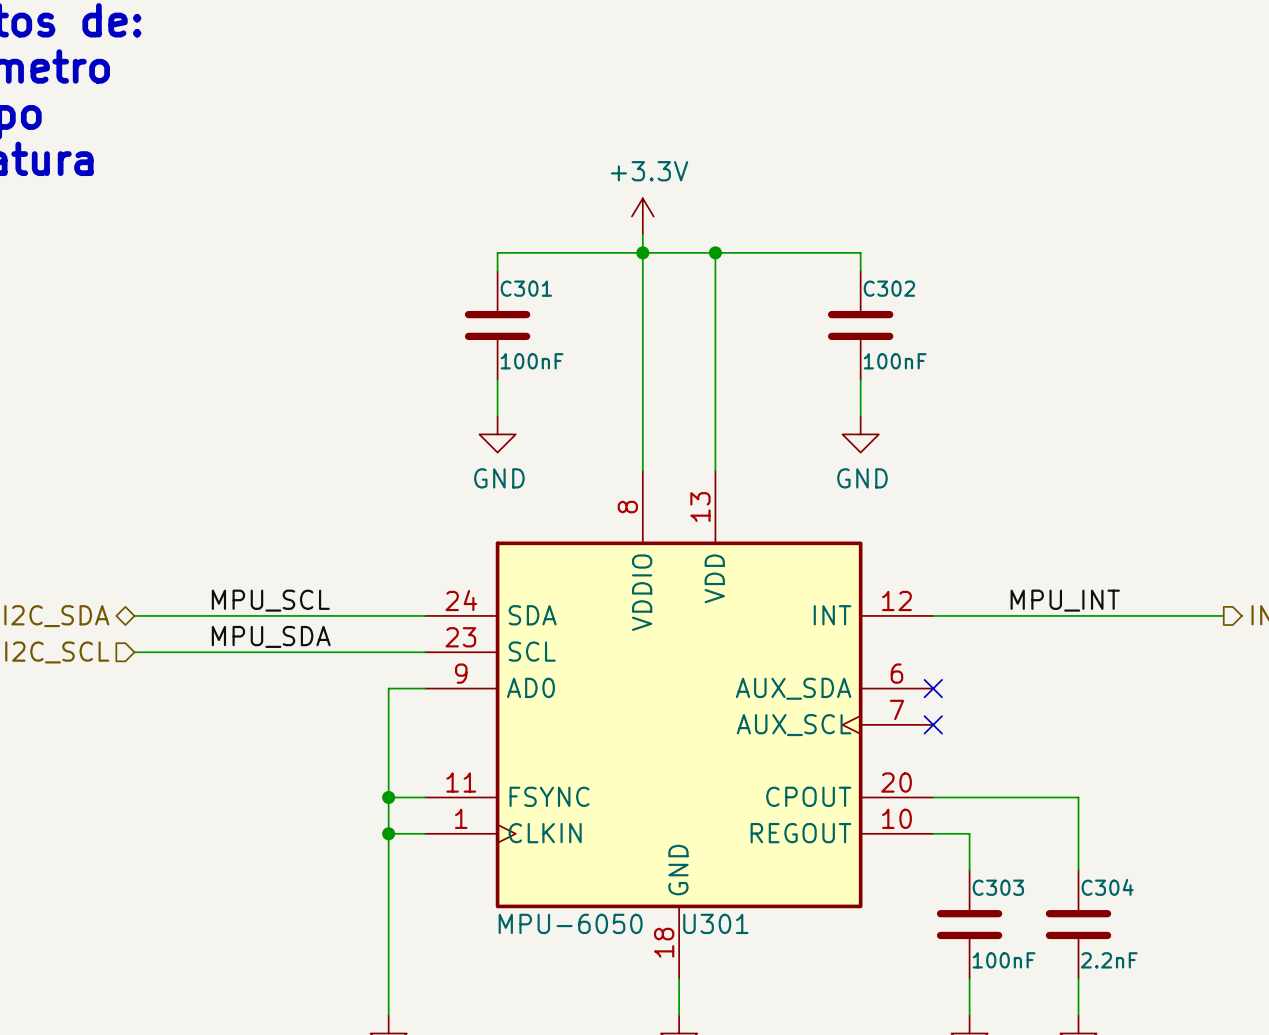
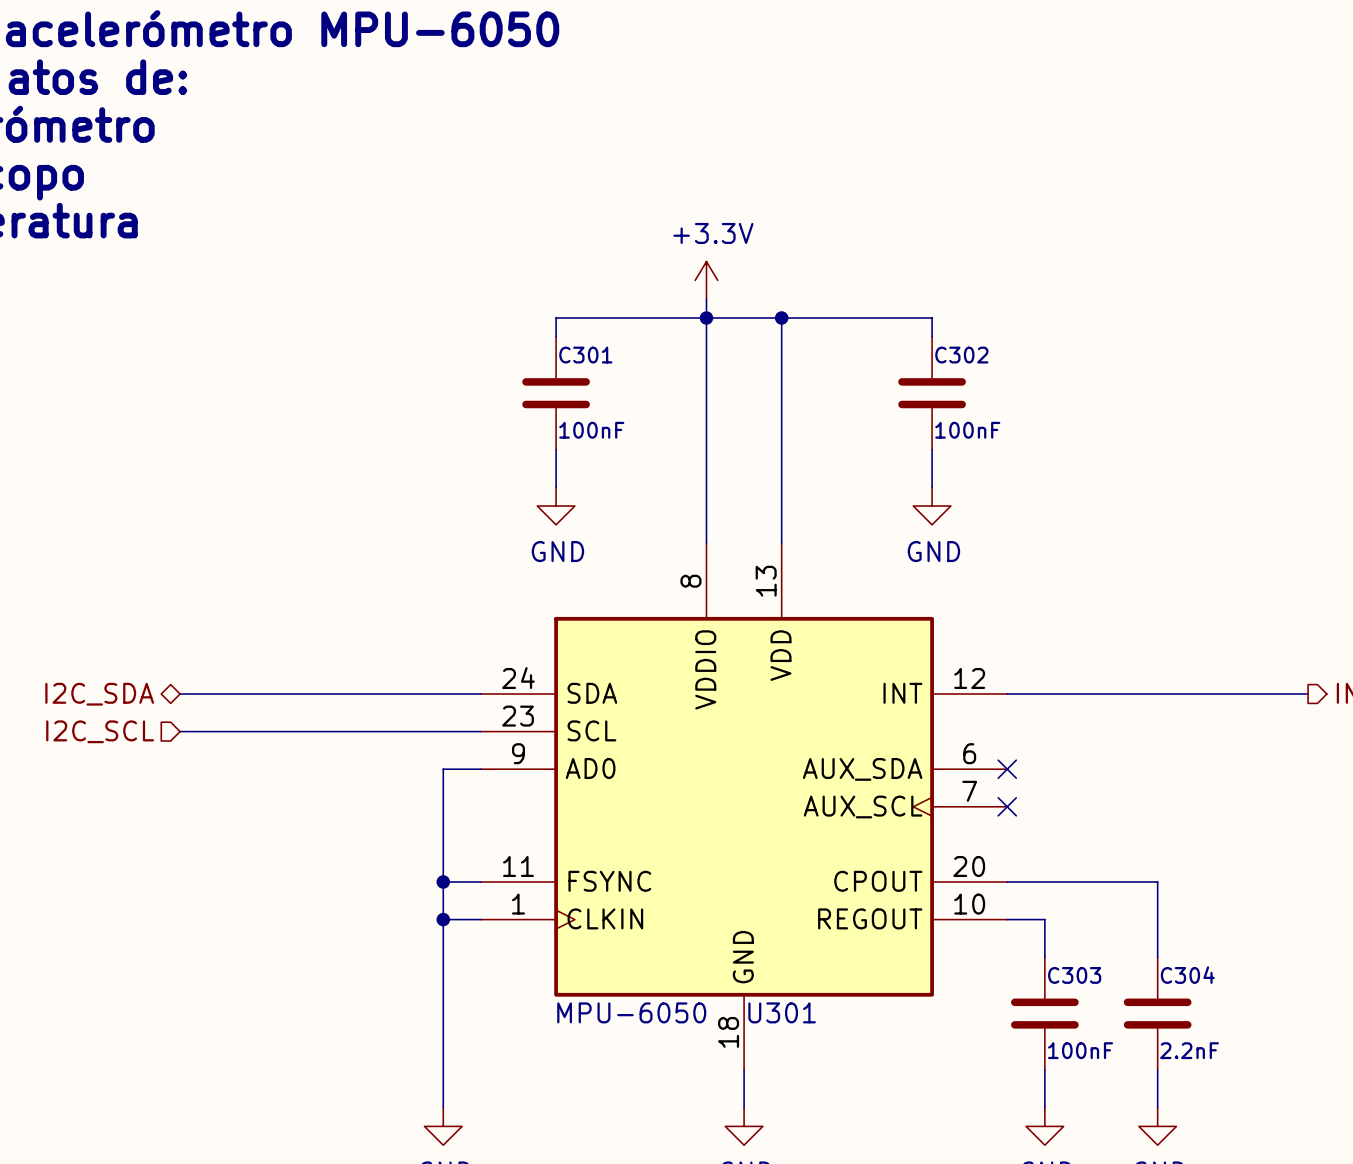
label: MPU_SCL (270, 600) -> none
label: MPU_INT (1065, 600) -> none
label: MPU_SDA (271, 636) -> none

